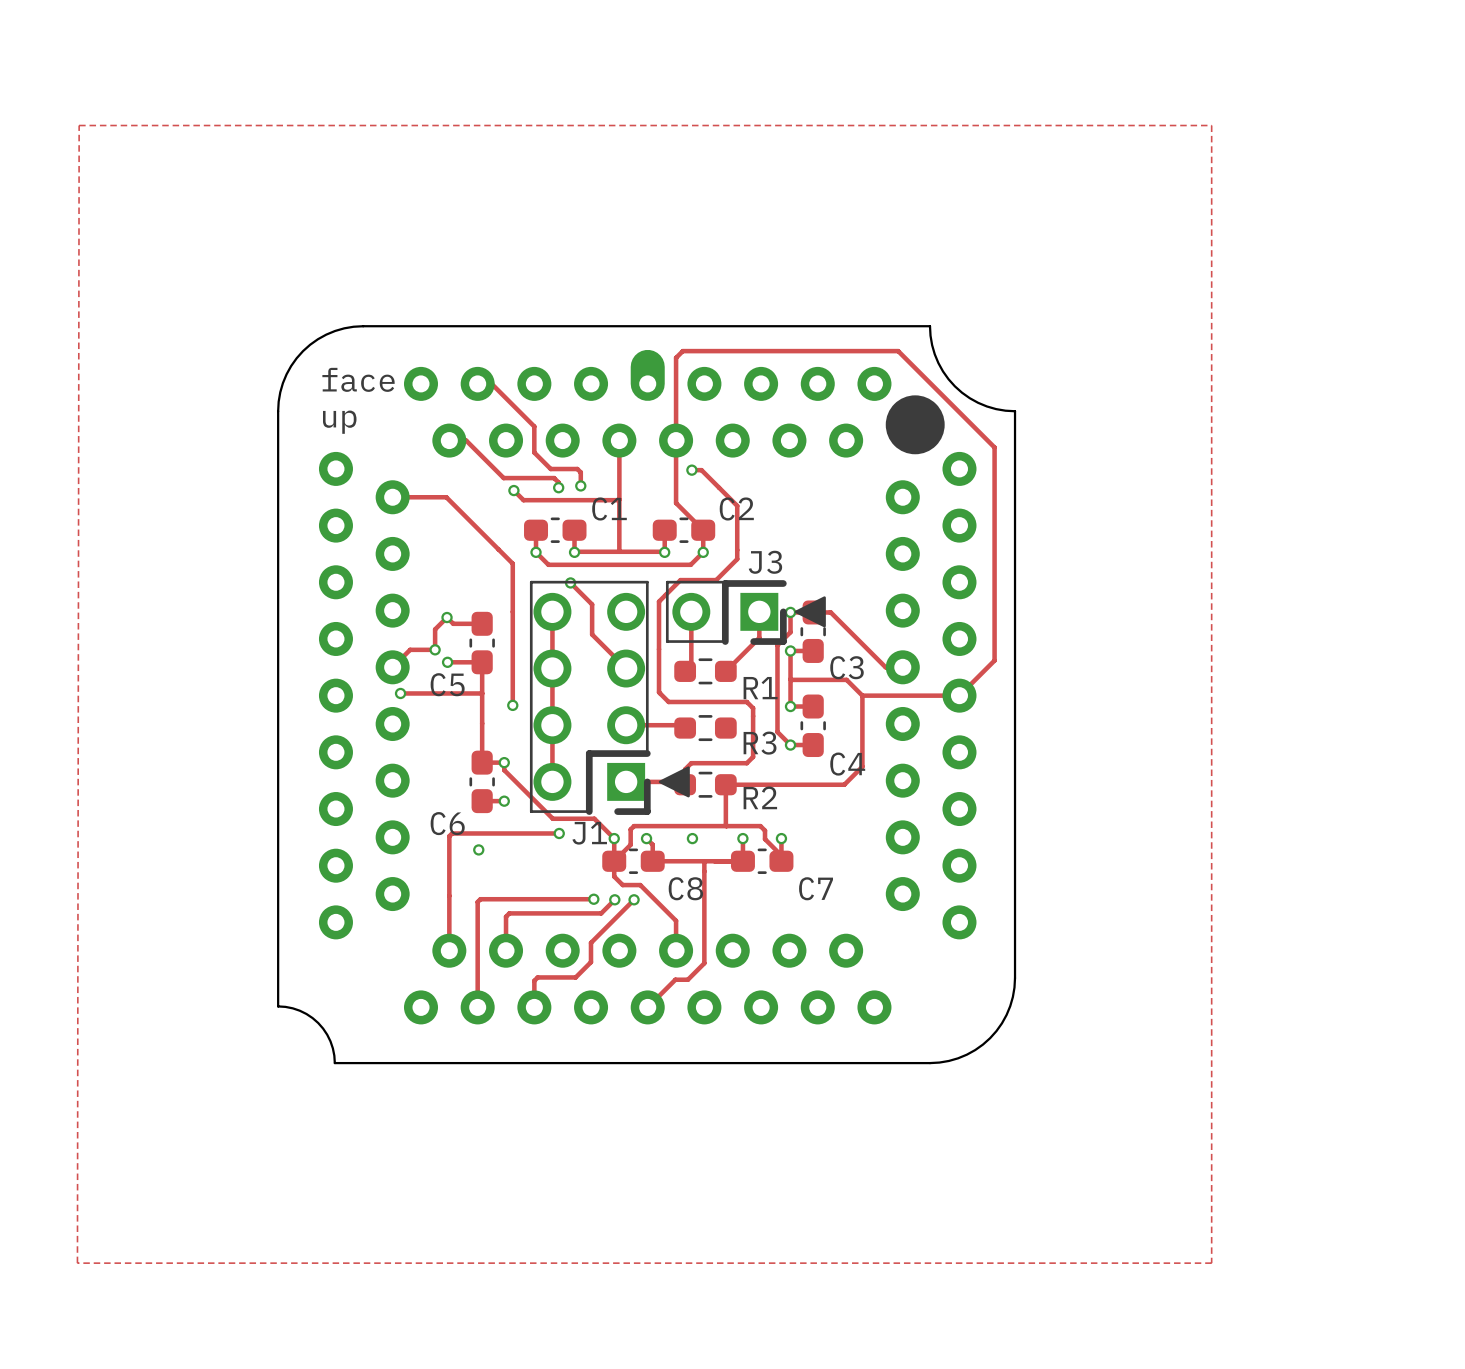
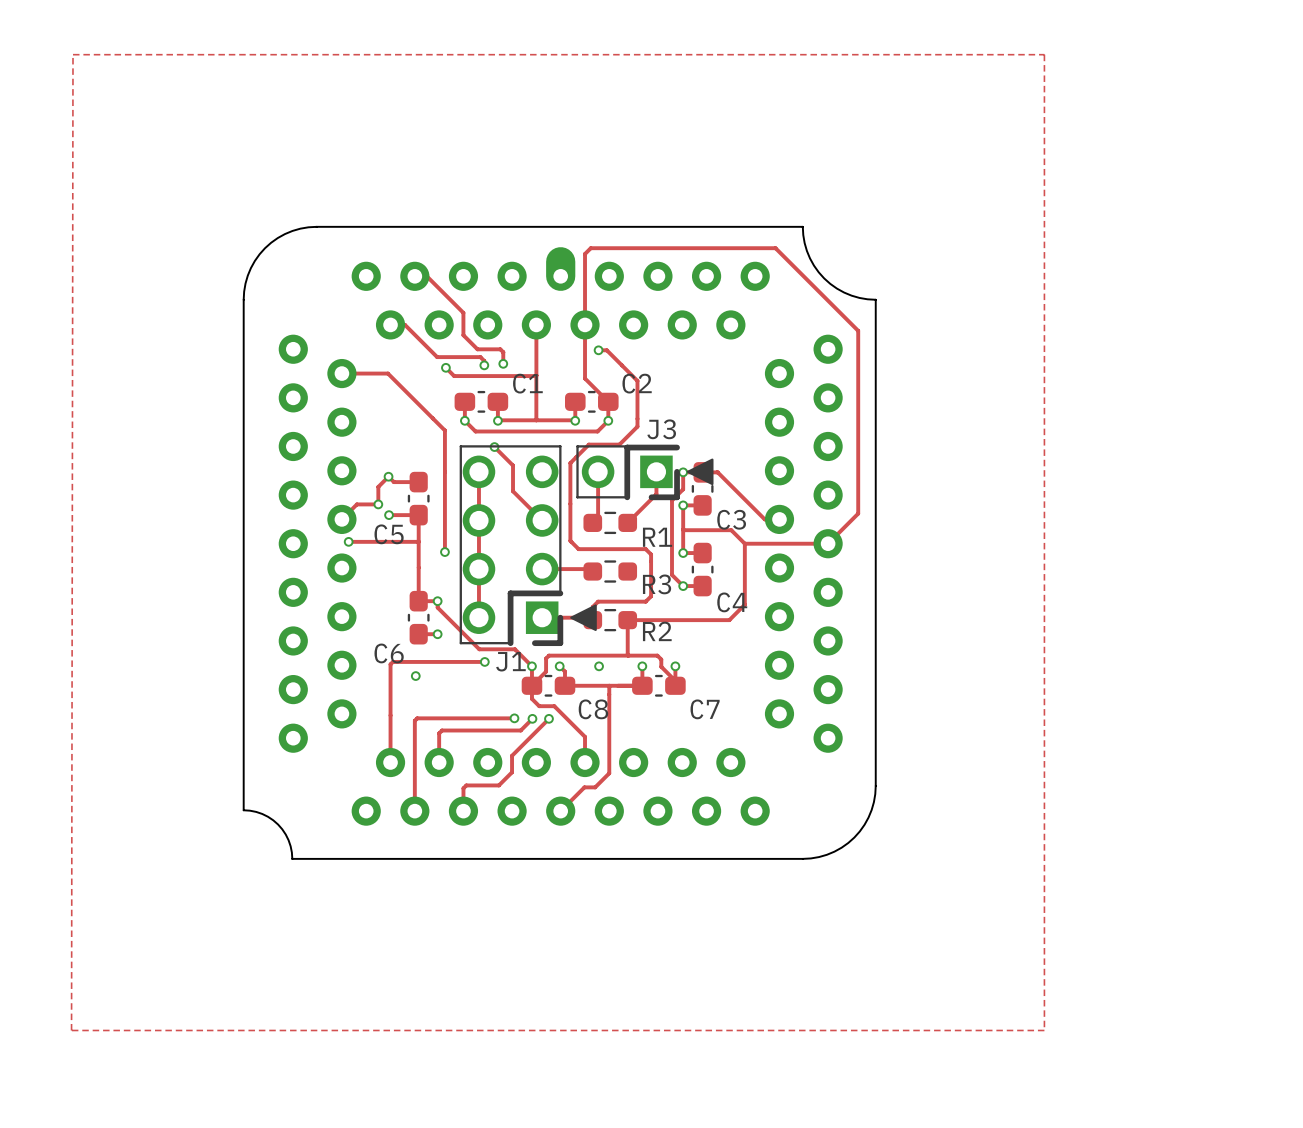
text: face (358, 379) -> none
drawing: [885, 395, 945, 455] -> none
text: up (339, 422) -> none

